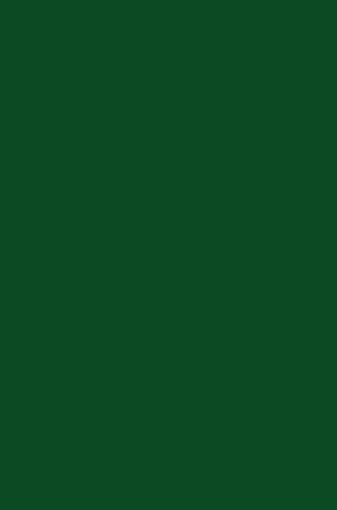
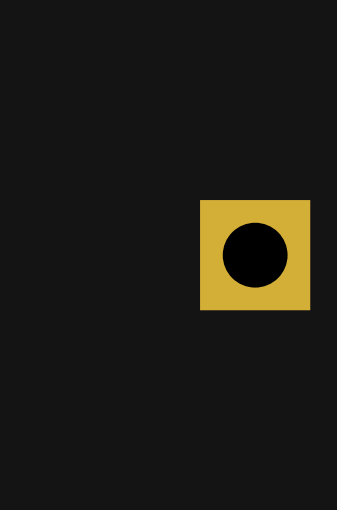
part: none -> (255, 255)

